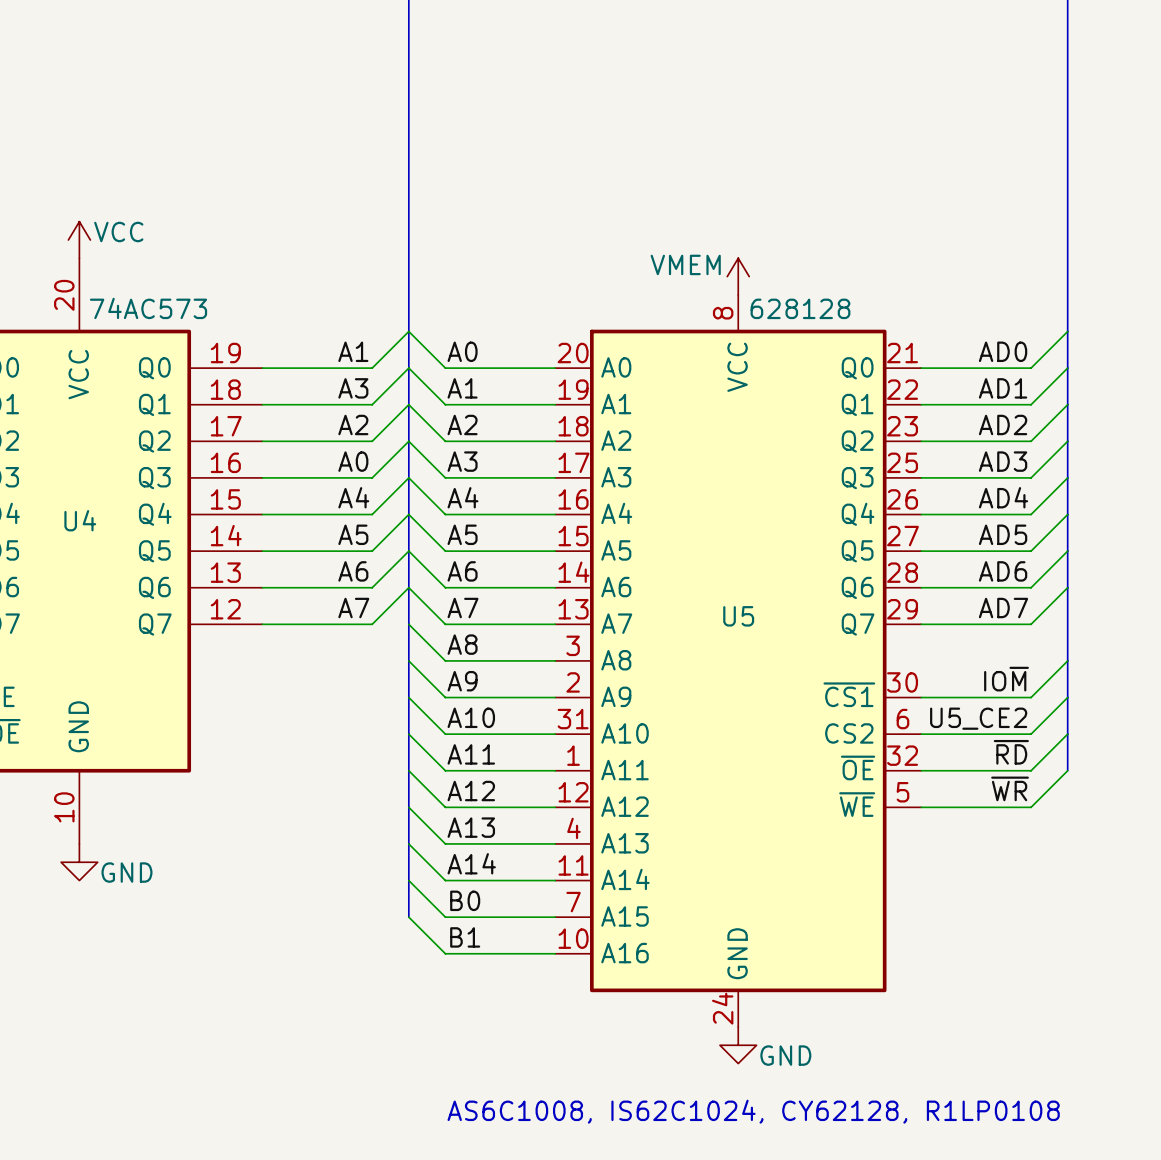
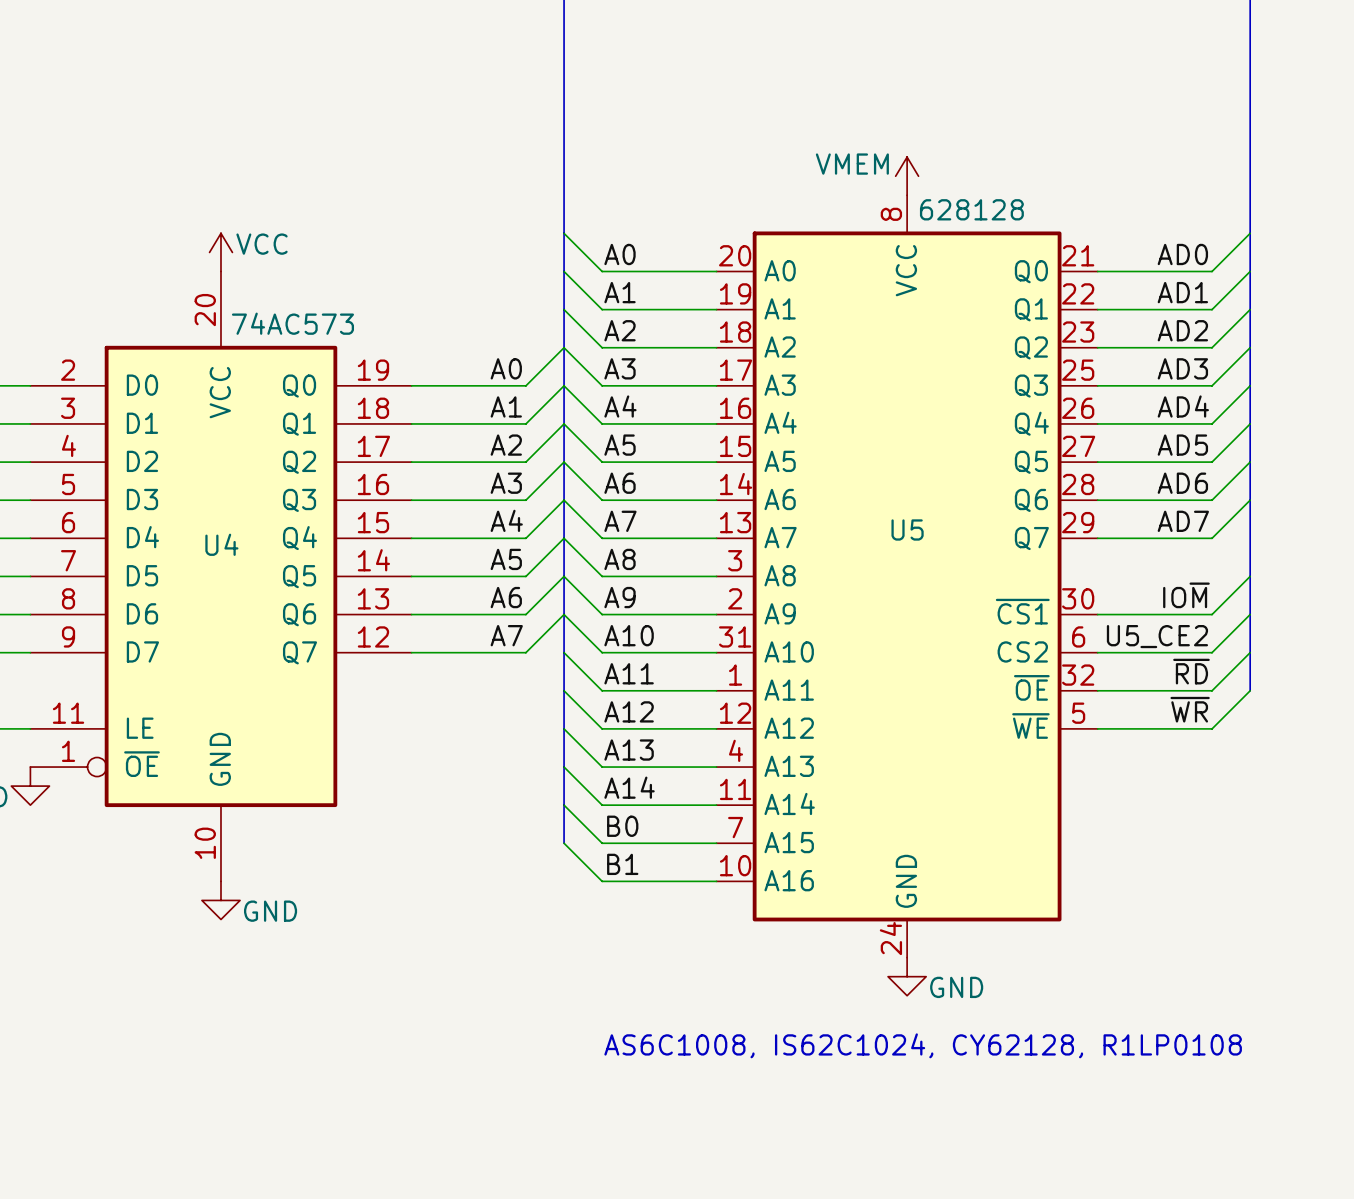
wire: none -> (564, 233) (602, 271) (716, 271)
wire: none -> (1250, 233) (1212, 271) (1097, 271)
label: none -> A0 (620, 254)
label: none -> AD0 (1182, 254)
wire: none -> (564, 271) (602, 309) (716, 309)
wire: none -> (1250, 271) (1212, 309) (1097, 309)
power symbol position: VMEM (738, 276) -> VMEM (907, 176)
label: none -> A1 (620, 292)
label: none -> AD1 (1182, 292)
wire: none -> (564, 309) (602, 347) (716, 347)
label: none -> A2 (620, 330)
label: none -> AD2 (1182, 330)
label: A1 (353, 351) -> A0 (506, 368)
label: A0 (462, 351) -> A3 (620, 368)
label: AD0 (1003, 351) -> AD3 (1182, 368)
label: A3 (353, 388) -> A1 (506, 406)
label: A1 (462, 388) -> A4 (620, 406)
label: AD1 (1003, 388) -> AD4 (1183, 406)
label: A2 (462, 424) -> A5 (620, 445)
label: AD2 (1003, 424) -> AD5 (1182, 445)
label: A0 (353, 461) -> A3 (506, 483)
label: A3 (462, 461) -> A6 (620, 483)
label: AD3 (1003, 461) -> AD6 (1182, 483)
label: A4 (463, 497) -> A7 (620, 521)
label: AD4 (1003, 497) -> AD7 (1183, 521)
wire: (1067, 514) (1031, 551) (921, 551) -> (1250, 309) (1212, 347) (1097, 347)
label: A5 (462, 534) -> A8 (620, 559)
label: AD5 (1003, 534) -> none
label: A6 (462, 571) -> A9 (620, 597)
label: AD6 (1003, 571) -> IO~{M} (1186, 595)
label: A7 (463, 608) -> A10 (629, 635)
label: AD7 (1003, 608) -> U5_CE2 (1157, 636)
label: A8 (462, 644) -> A11 (629, 673)
U5 position: (738, 660) -> (907, 576)
bus: (1067, 660) (1067, 770) -> none
label: IO~{M} (1006, 679) -> ~{WR} (1190, 709)
label: A9 (462, 681) -> A12 (629, 711)
wire: (1067, 697) (1031, 734) (921, 734) -> (1250, 652) (1212, 690) (1097, 690)
label: A10 (471, 717) -> A13 (629, 750)
label: U5_CE2 (978, 718) -> none
wire: (1067, 734) (1031, 770) (921, 770) -> none
label position: ~{RD} (1011, 752) -> ~{RD} (1191, 671)
label: A11 (471, 754) -> A14 (629, 787)
wire: (1067, 770) (1031, 807) (921, 807) -> none
label: ~{WR} (1010, 788) -> none
label: A12 (471, 791) -> B0 (622, 826)
bus: (408, 807) (408, 917) -> none
label: A13 (471, 827) -> B1 (622, 864)
wire: (408, 843) (445, 880) (555, 880) -> none
label: A14 (471, 863) -> none
wire: (408, 880) (445, 917) (555, 917) -> none
label: B0 (465, 900) -> none
wire: (408, 917) (445, 953) (555, 953) -> none
label: B1 (465, 937) -> none
power symbol position: GND (738, 1045) -> GND (907, 976)
text position: AS6C1008, IS62C1024, CY62128, R1LP0108 (753, 1111) -> AS6C1008, IS62C1024, CY62128, R1LP0108 (923, 1045)

